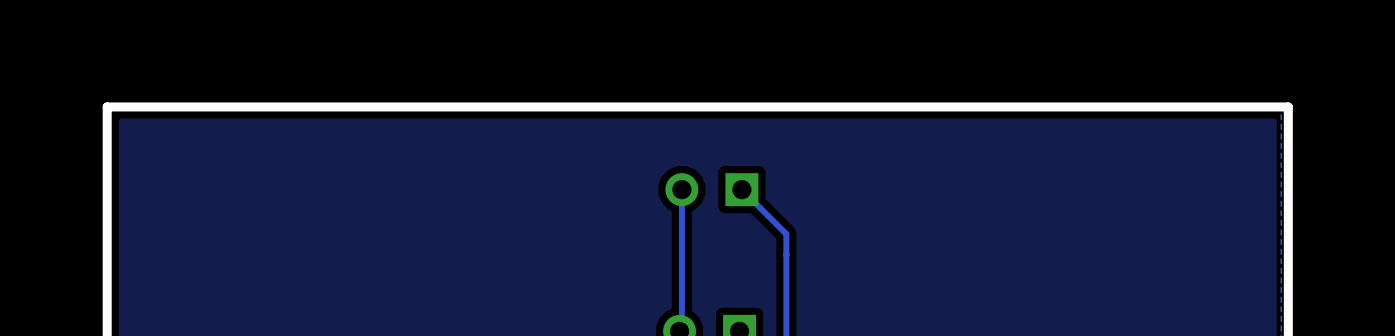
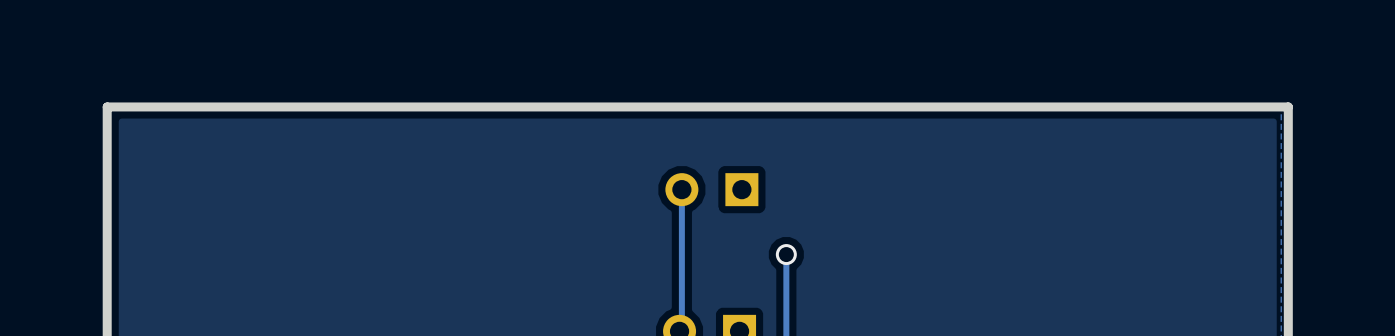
track: (741, 189) (786, 234) (786, 254) -> none
via: none -> (786, 254)

